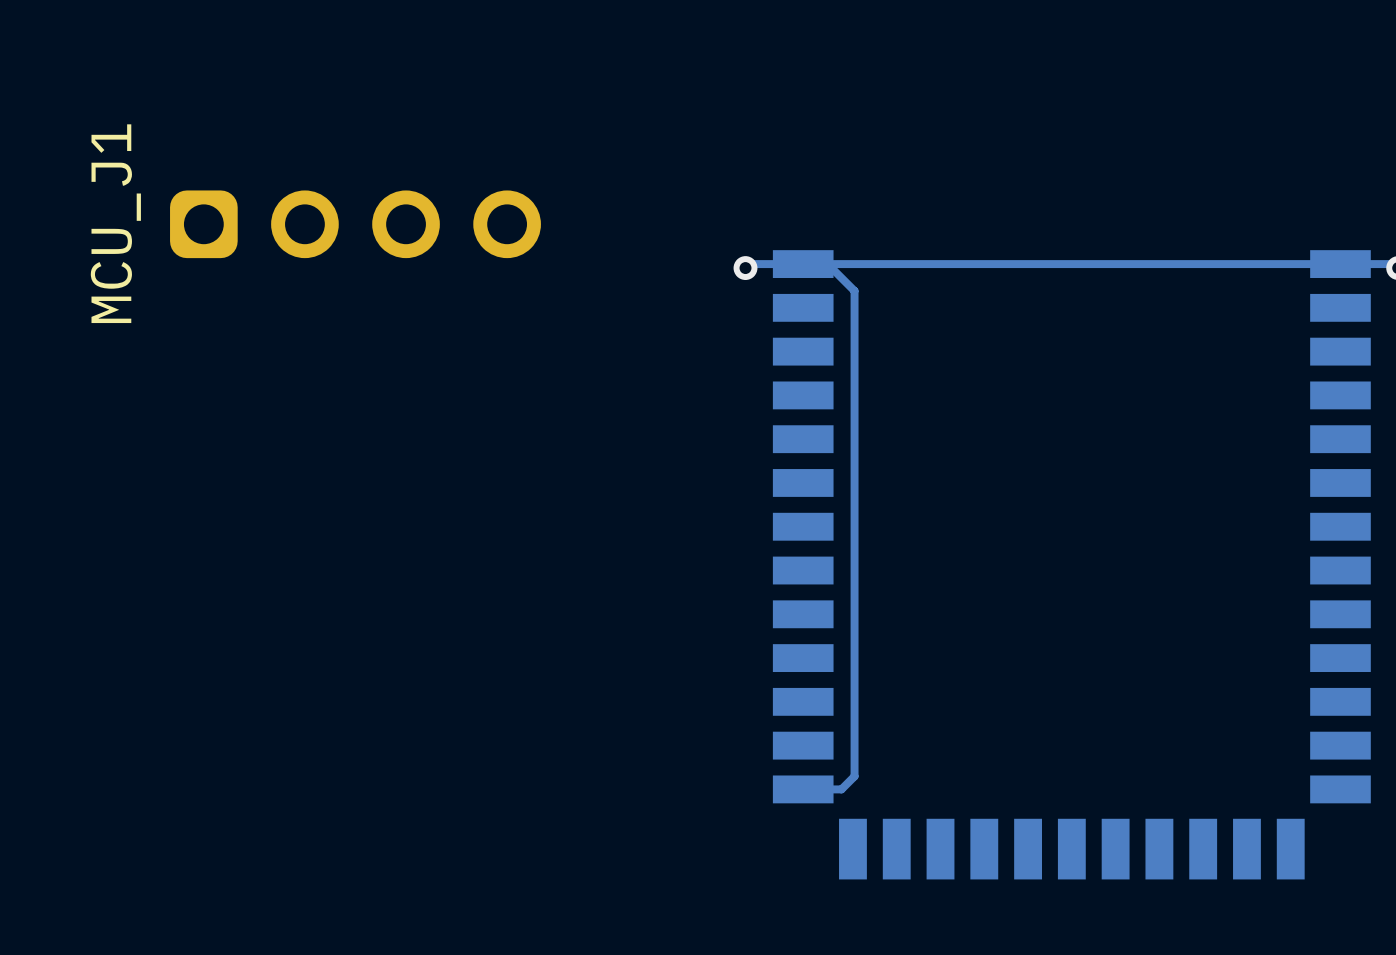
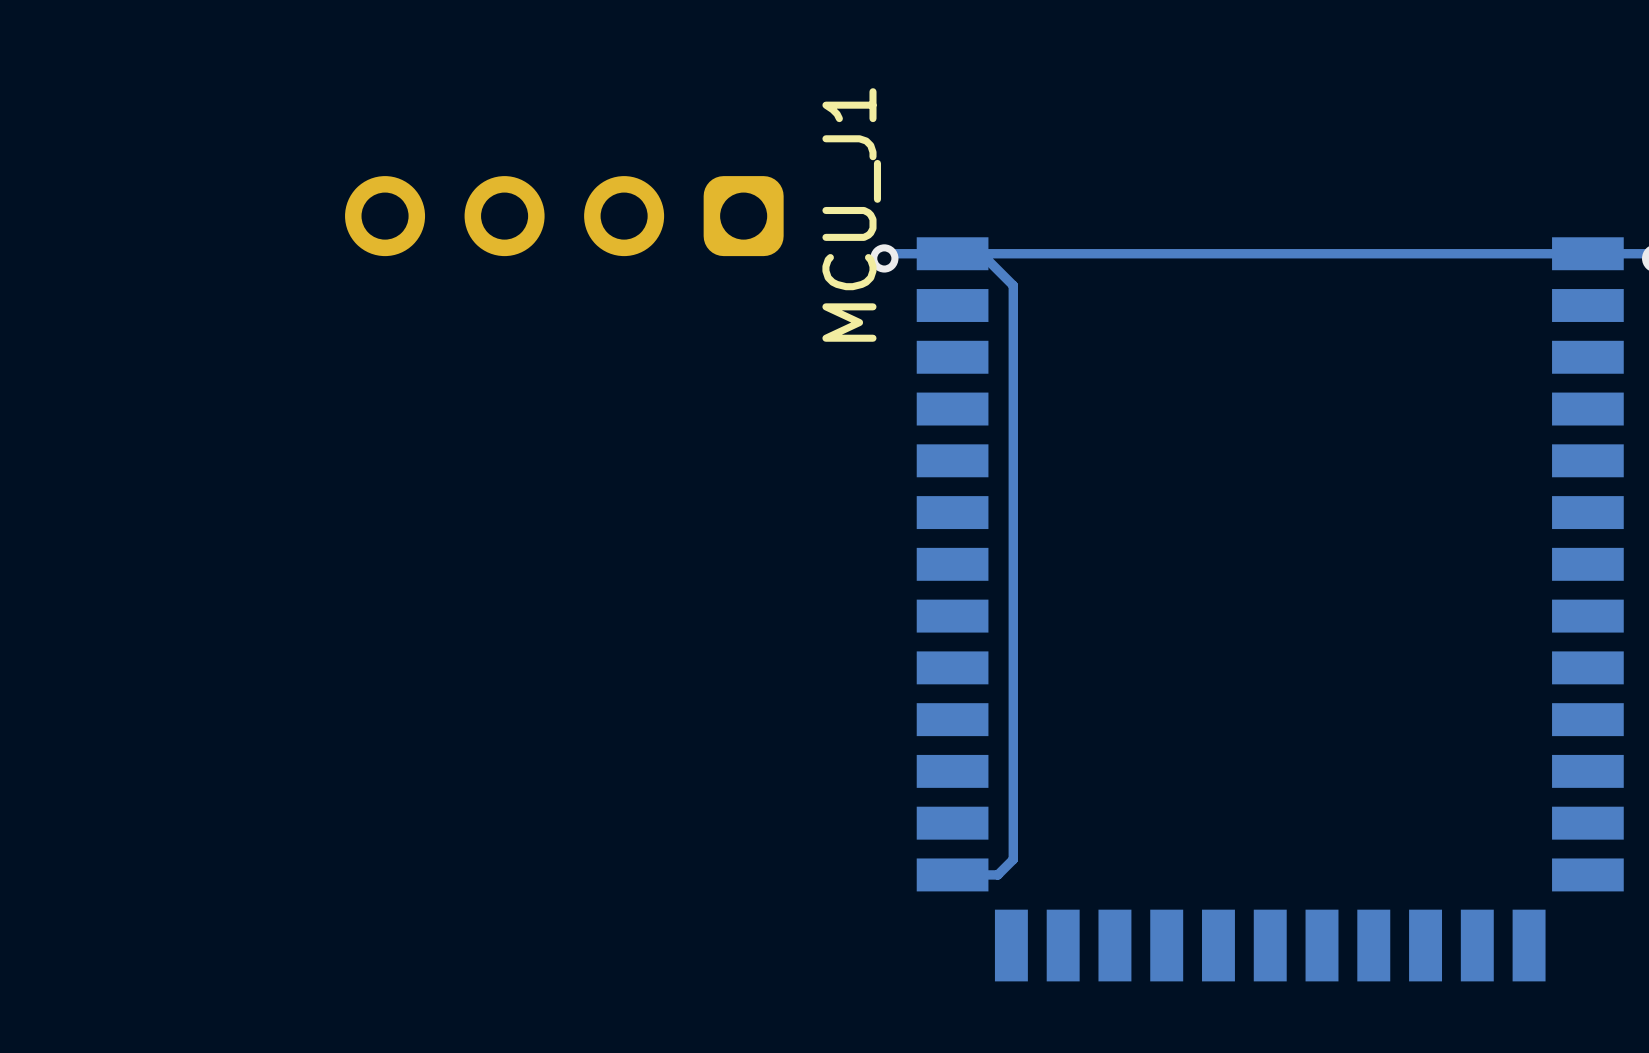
MCU_J1 rotation: 0° (355, 224) -> 180° (564, 216)

